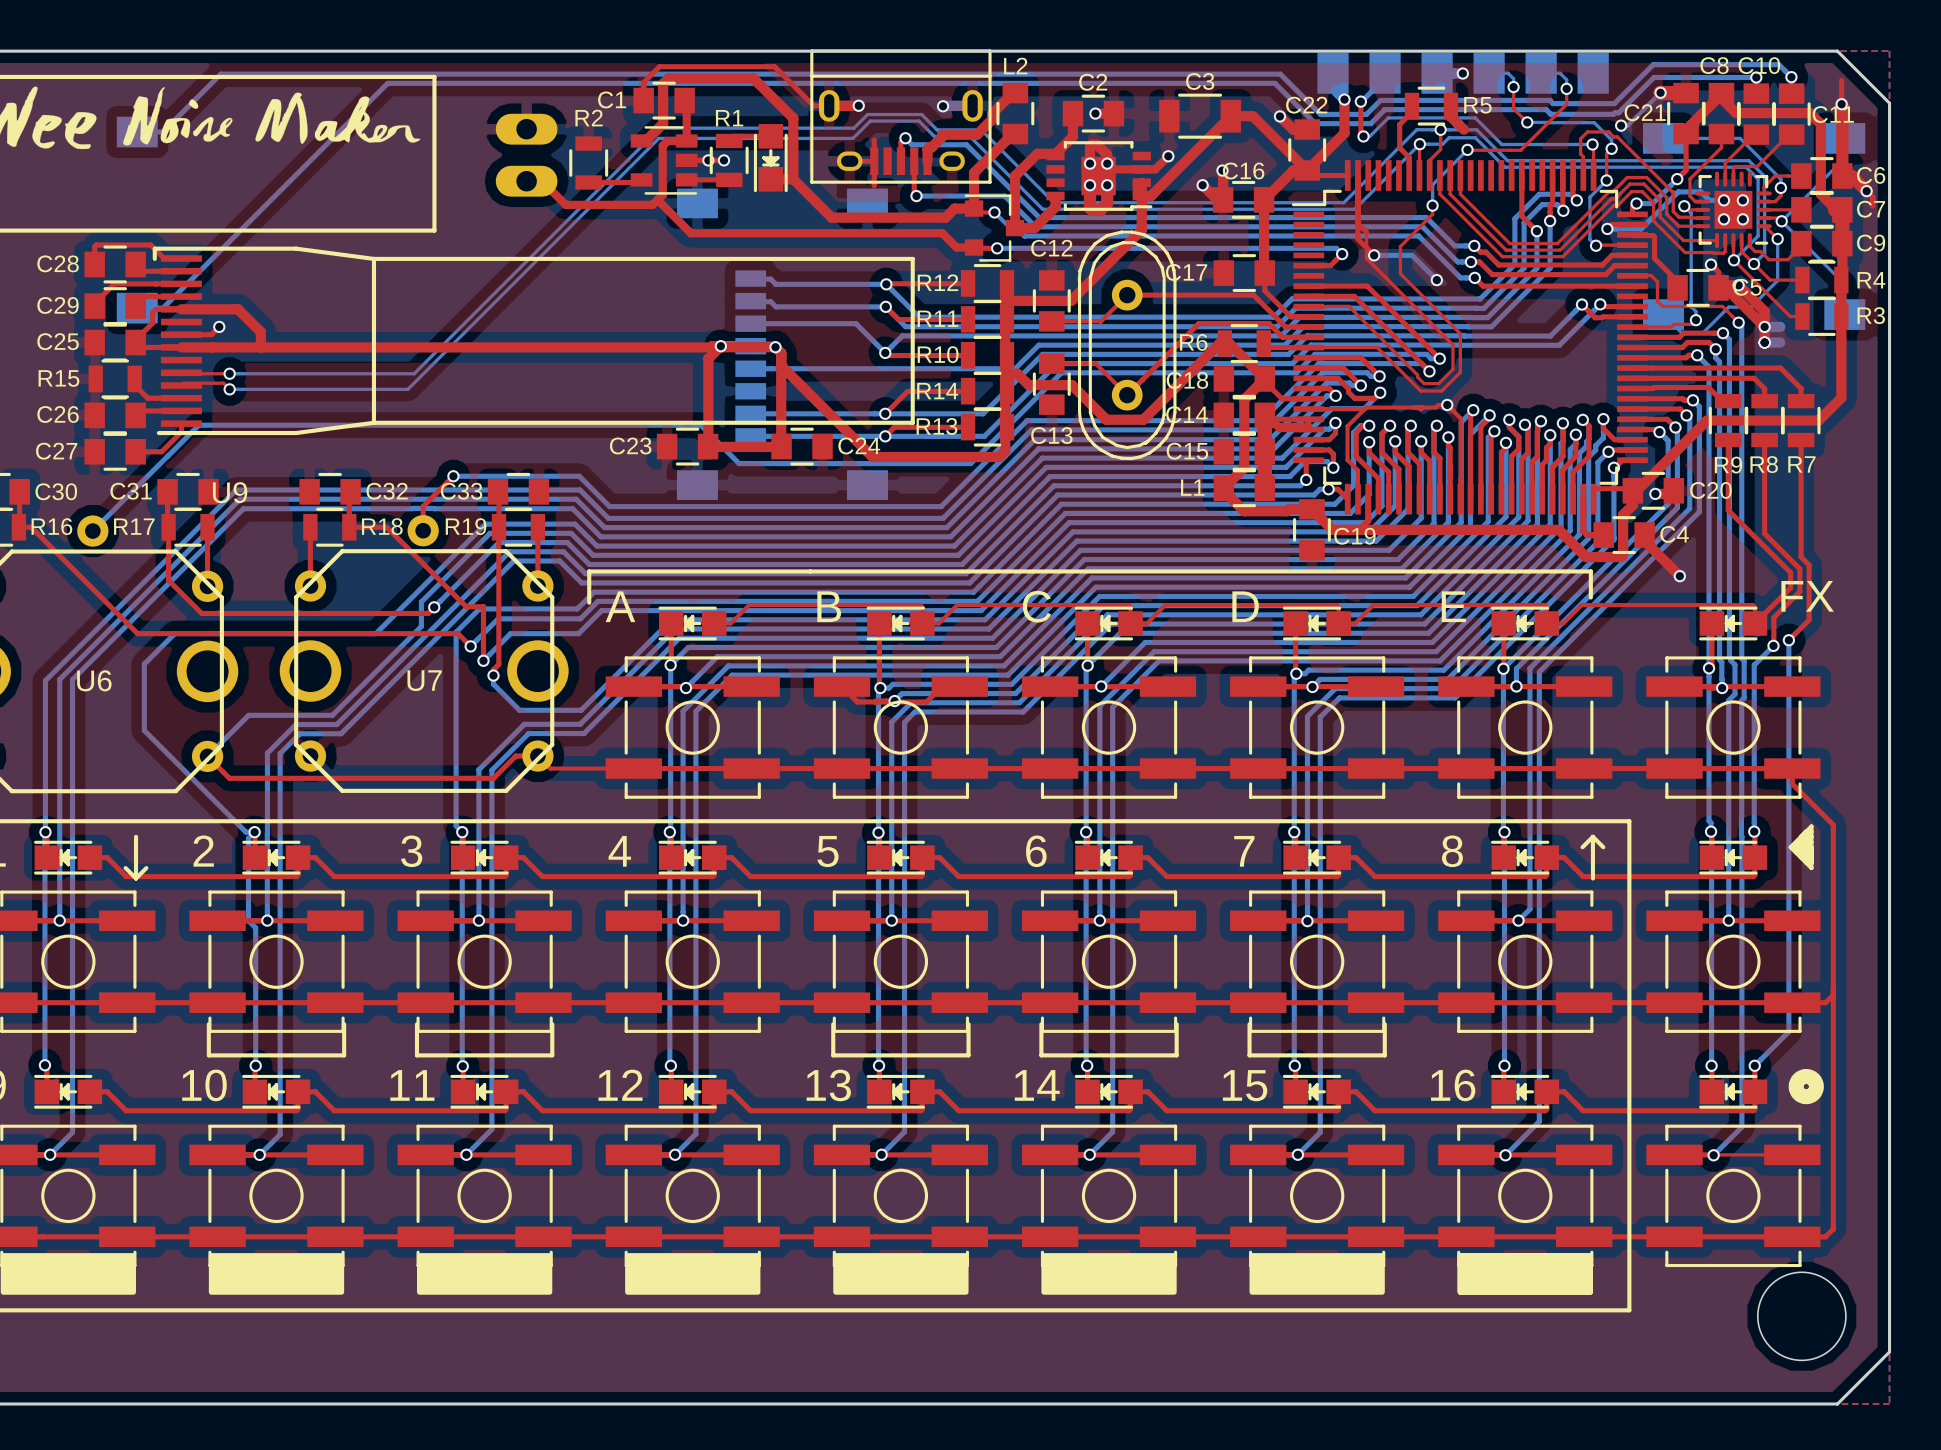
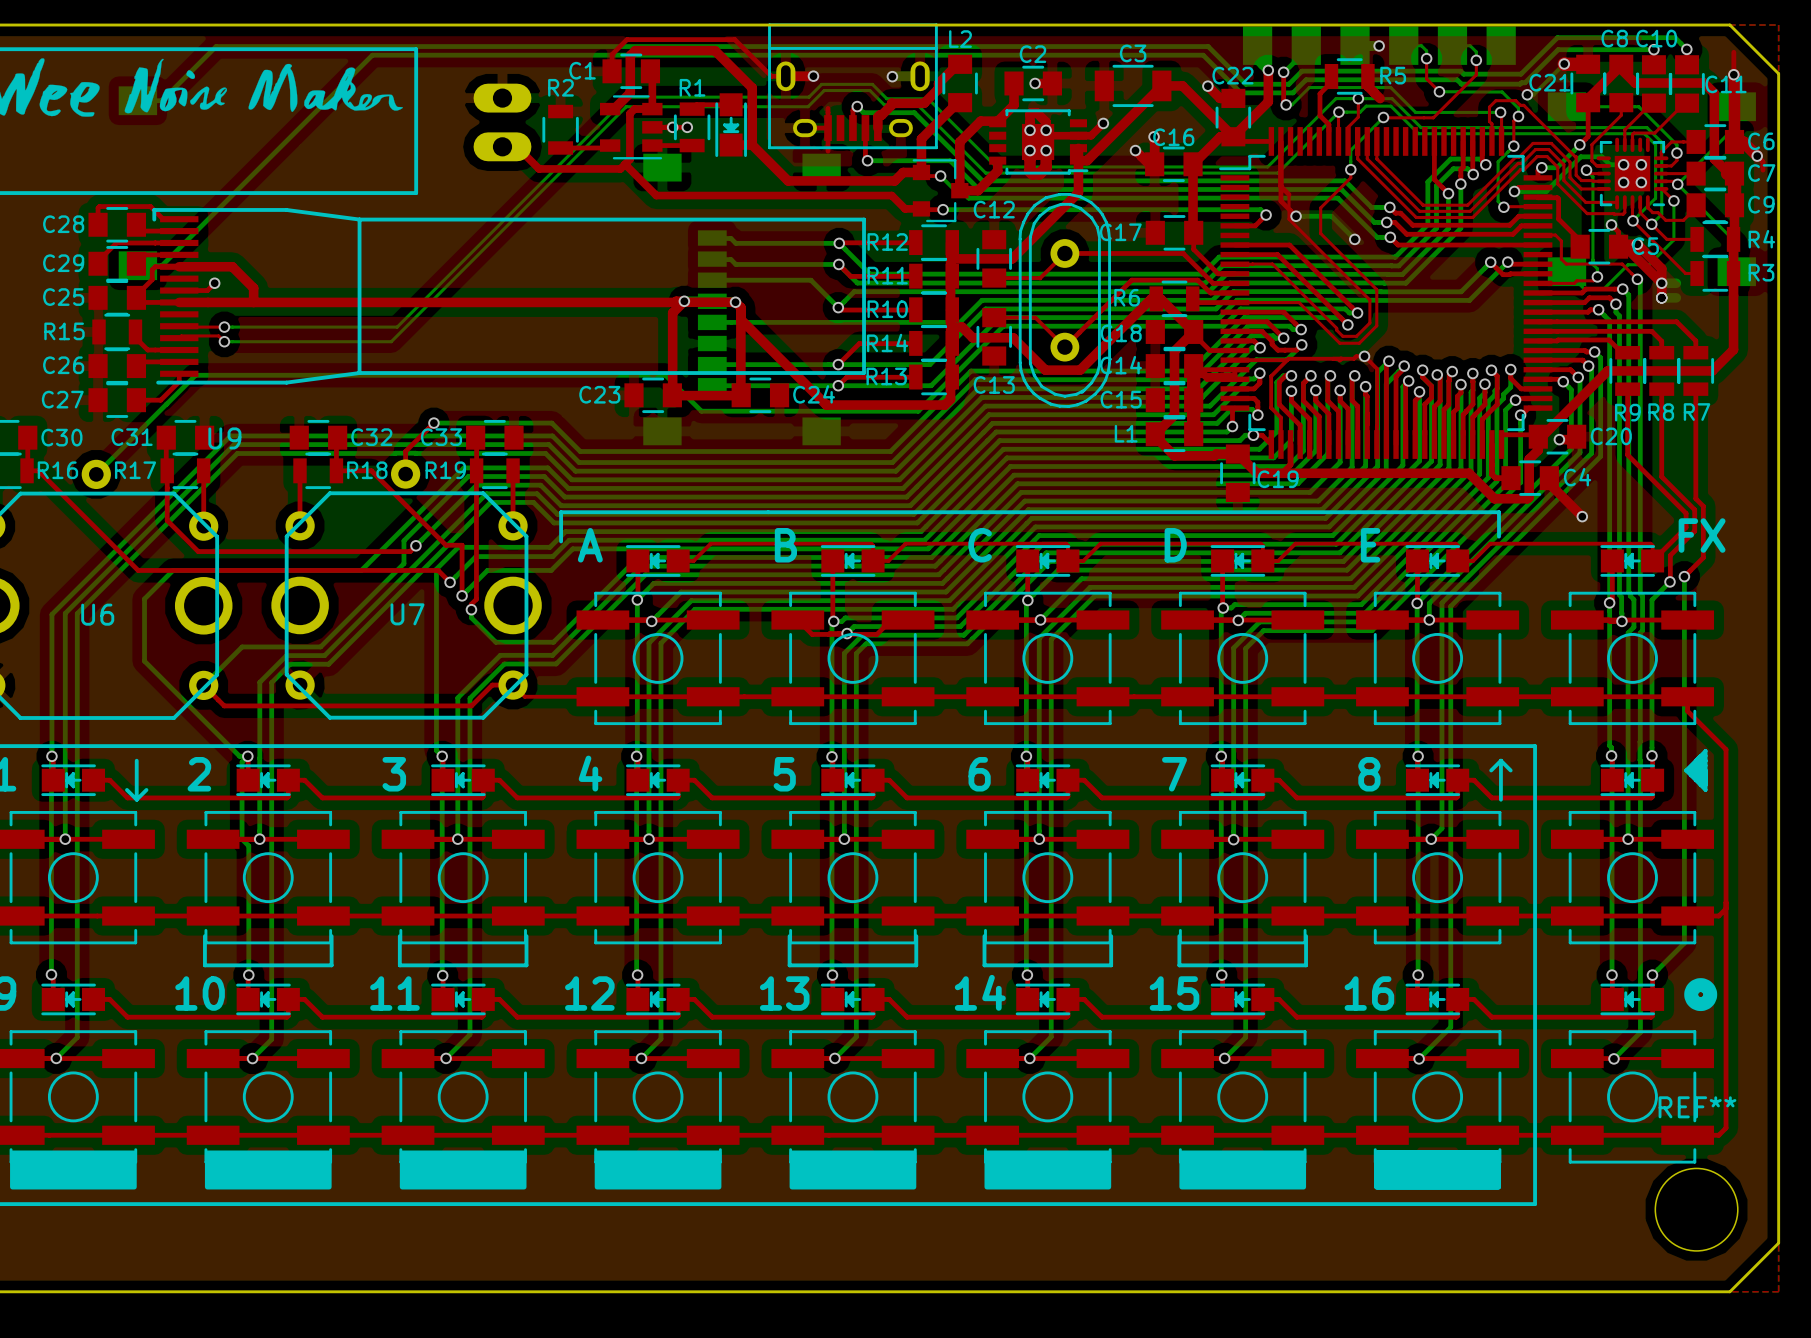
REF** name: none -> REF** (1697, 1107)

